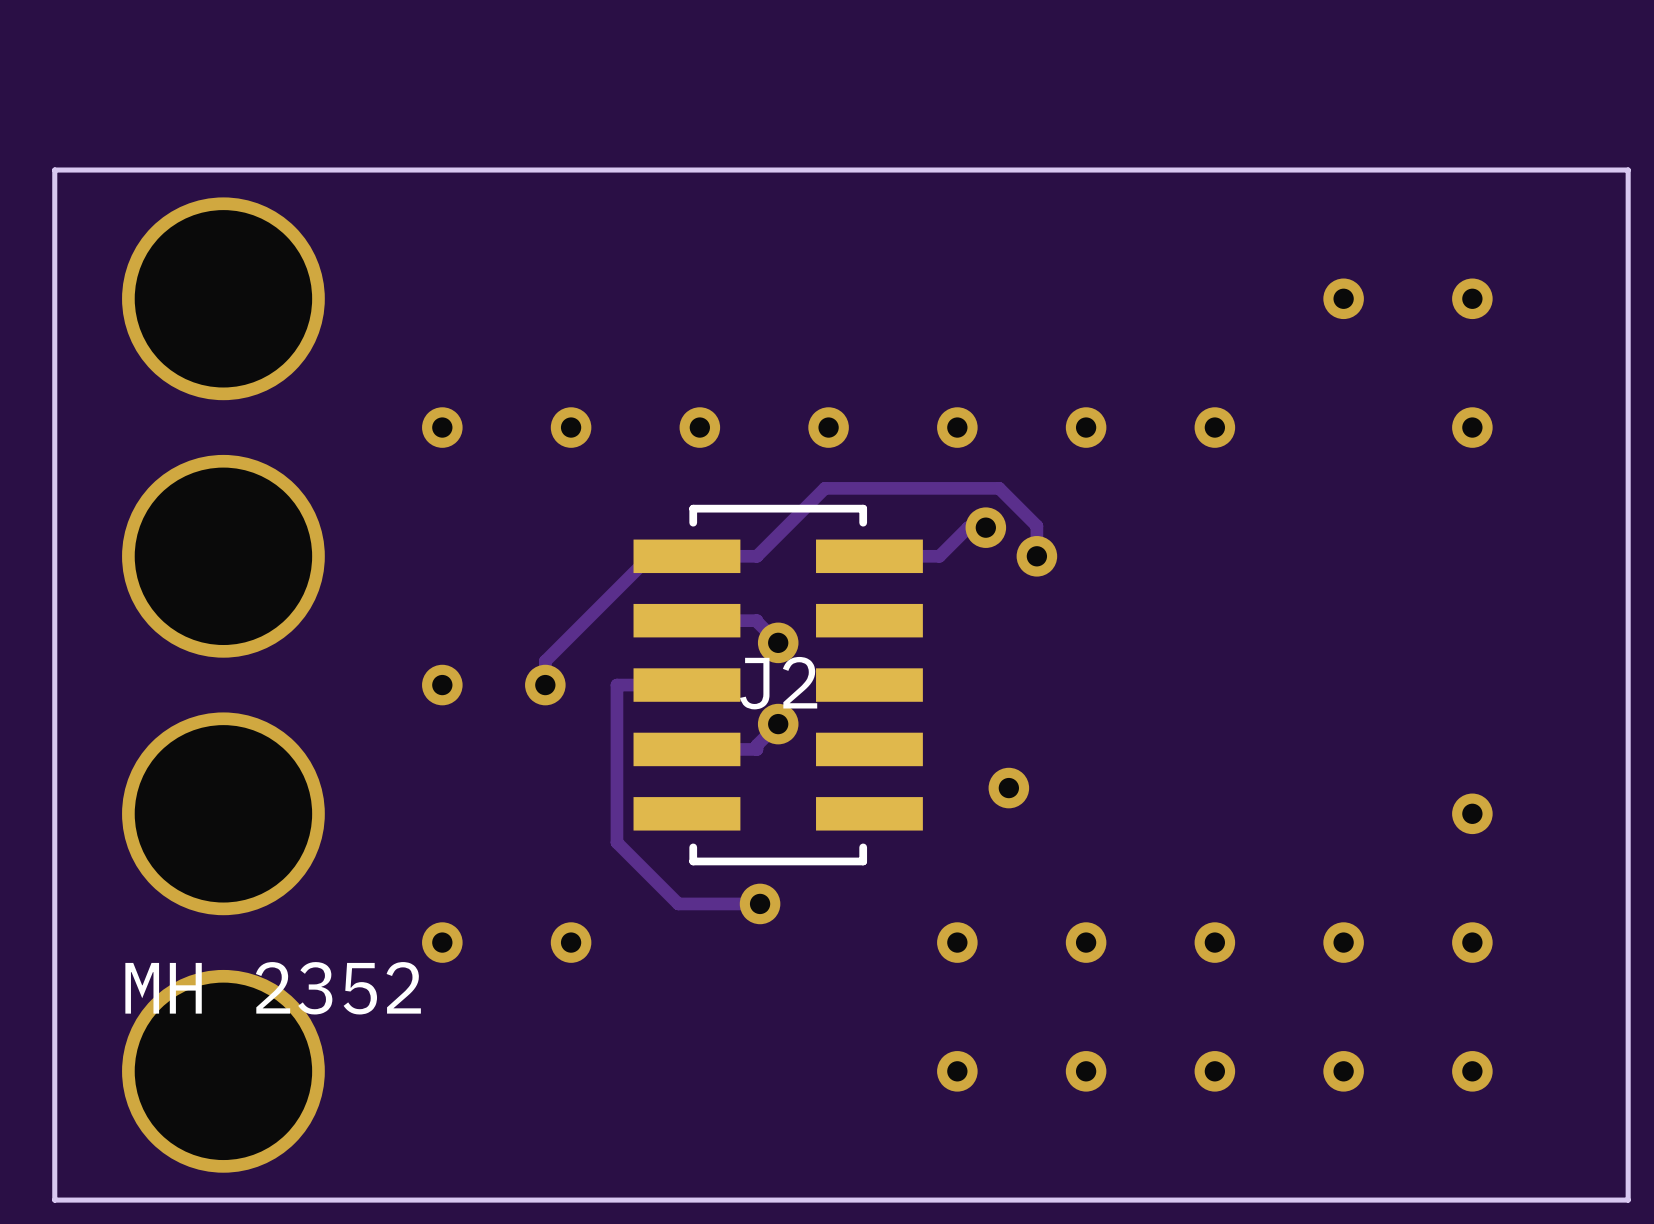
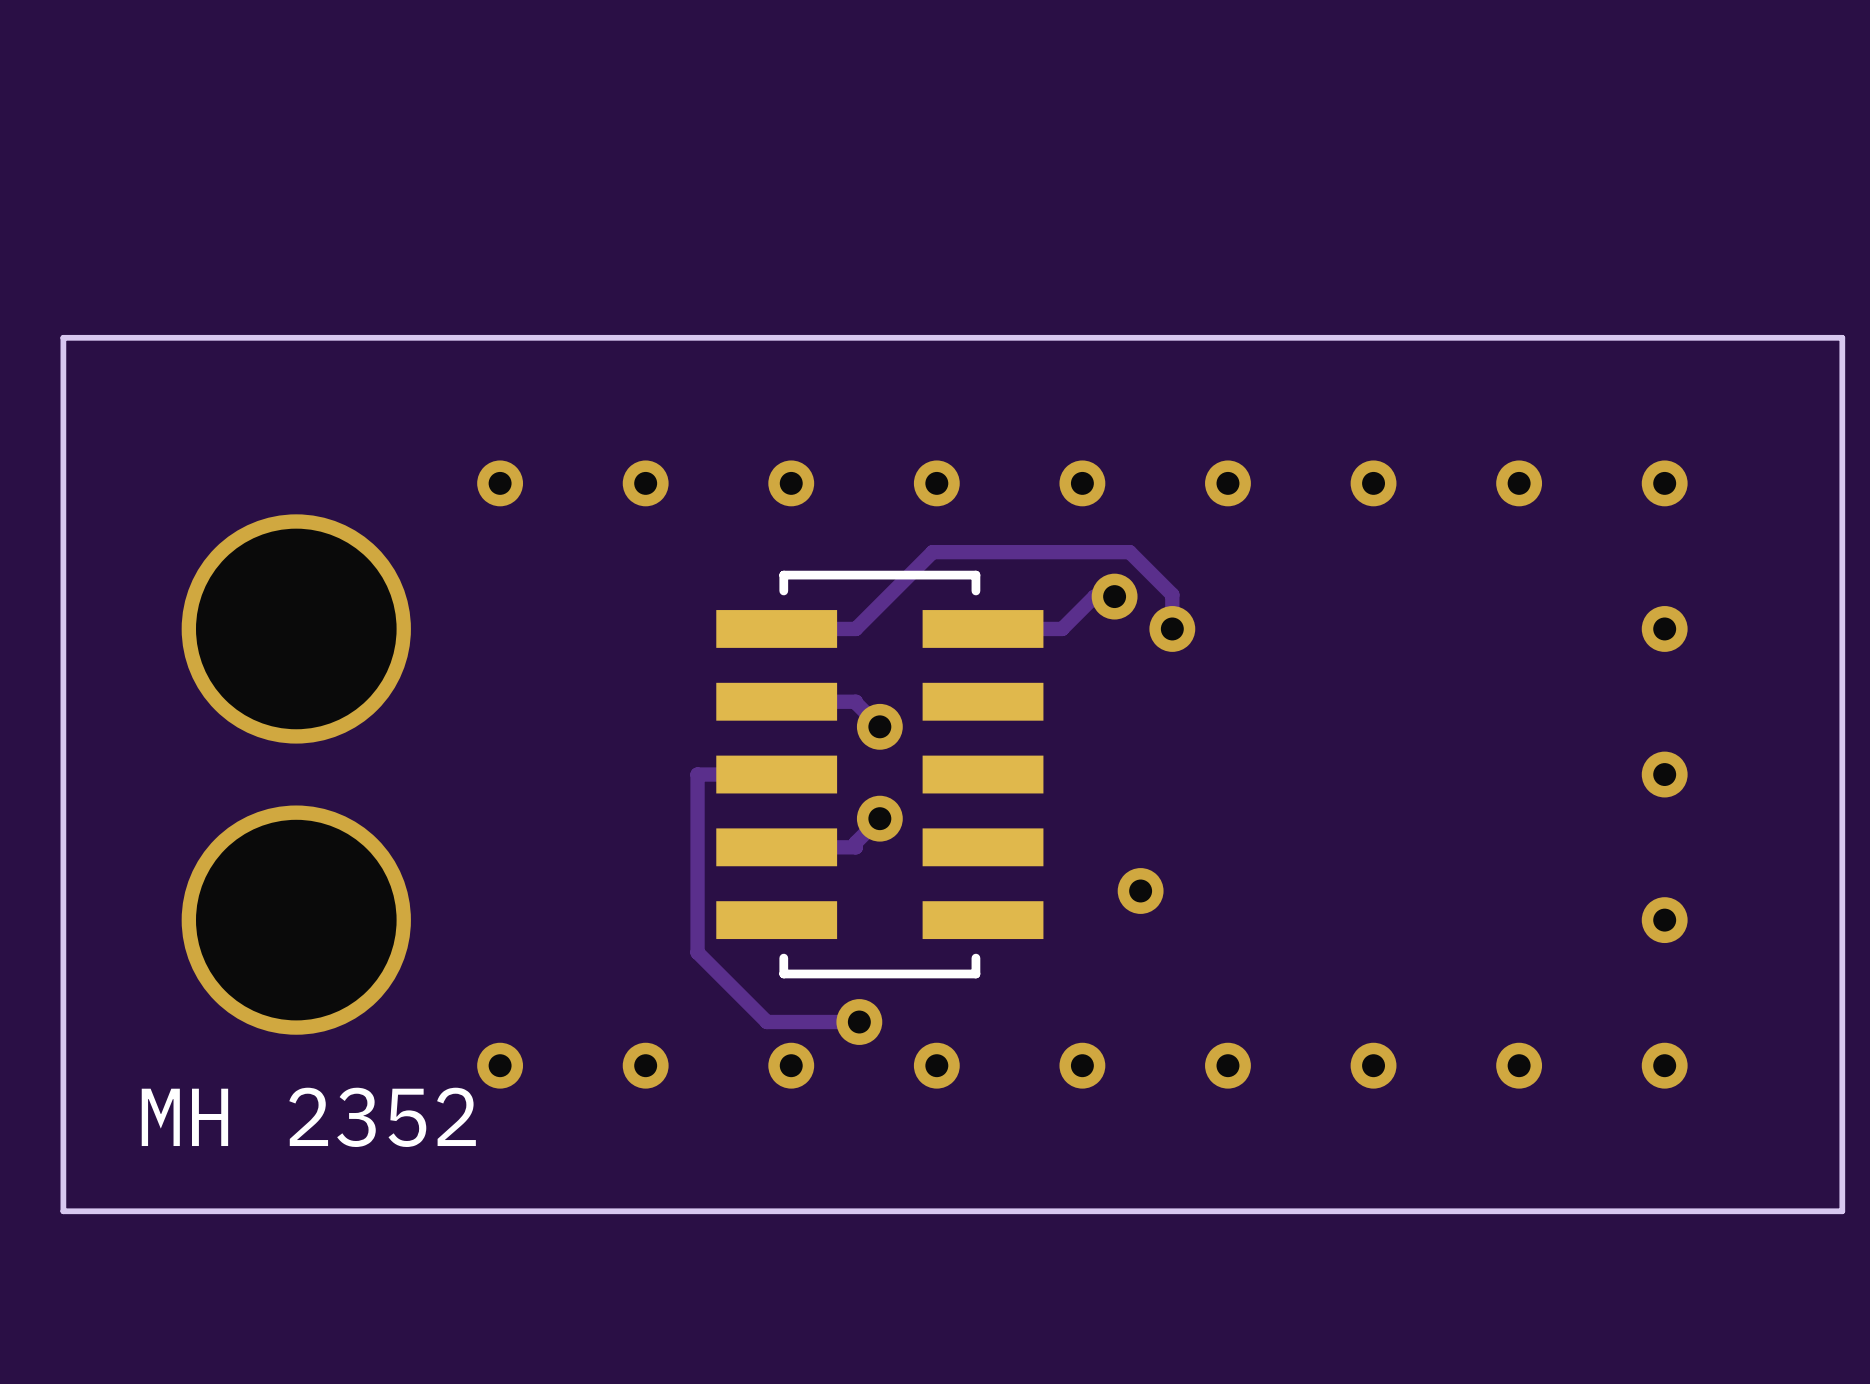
board edge: (1628, 170) (54, 170) (54, 1200) (1628, 1200) (1628, 170) -> (1842, 337) (1842, 1211) (63, 1211) (63, 337) (1842, 337)
via: (223, 298) -> none
via: (1343, 298) -> none
via: (1472, 298) -> none
via: none -> (1519, 483)
via position: (223, 556) -> (296, 628)
track: (686, 556) (650, 556) (545, 661) (545, 685) -> none
via: none -> (1664, 628)
J2 name: J2 (778, 683) -> none
via: (442, 685) -> none
via: (545, 685) -> none
via: none -> (1664, 774)
via position: (223, 813) -> (296, 920)
via: none -> (791, 1065)
via: none -> (936, 1065)
via: (223, 1071) -> none
via: (957, 1071) -> none
via: (1086, 1071) -> none
via: (1214, 1071) -> none
via: (1343, 1071) -> none
via: (1472, 1071) -> none

